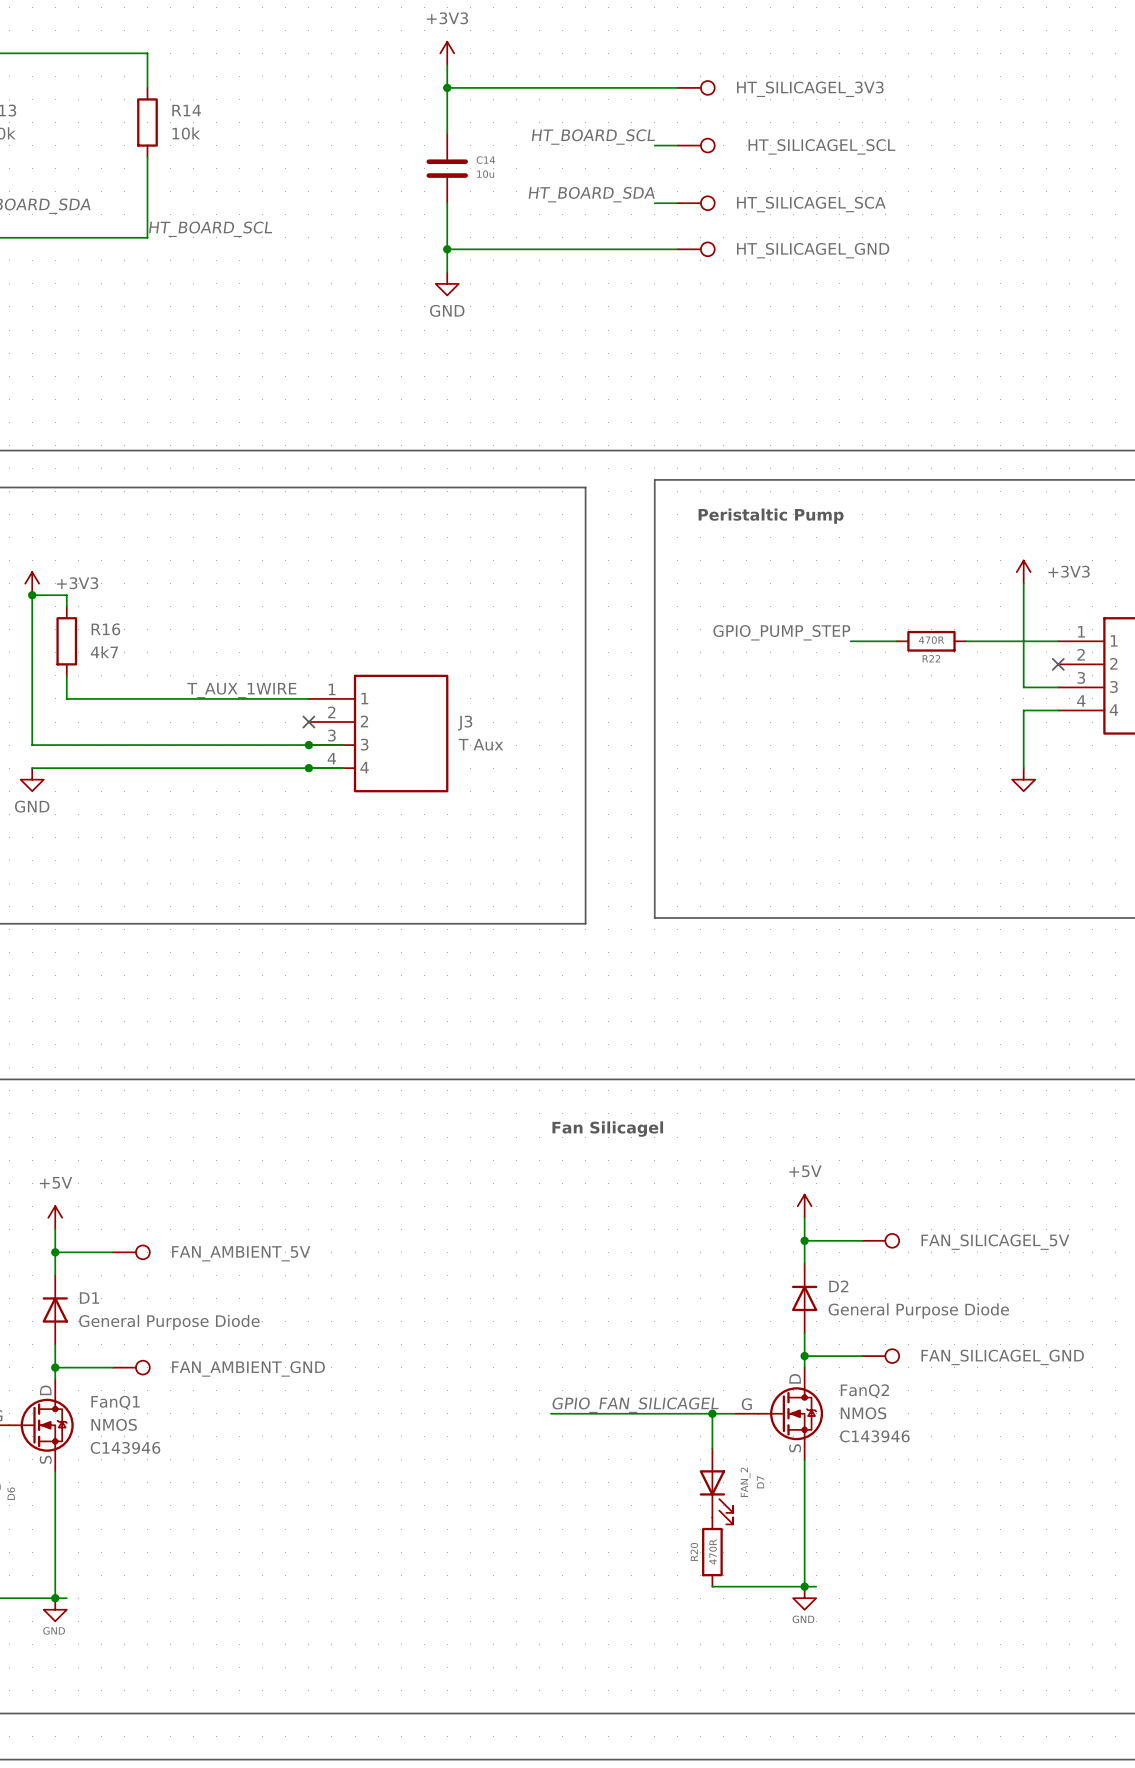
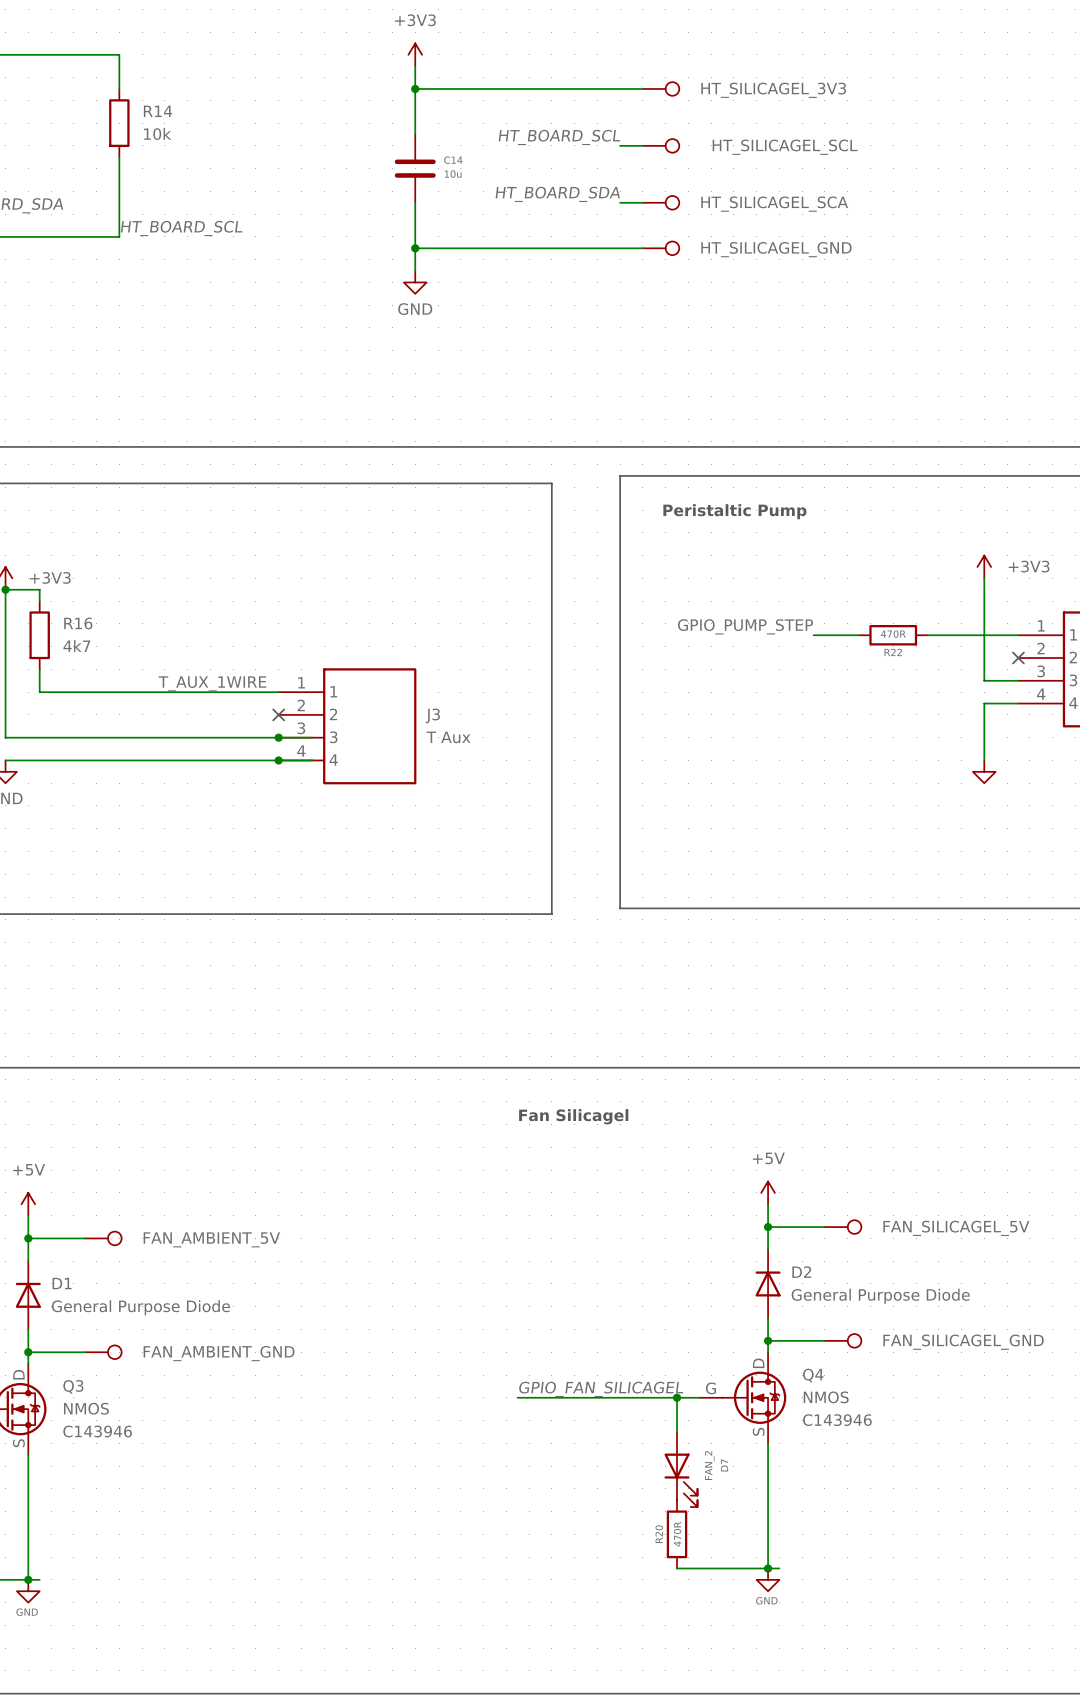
FanQ2 name: FanQ2 (864, 1391) -> Q4 (813, 1375)
FanQ1 name: FanQ1 (115, 1402) -> Q3 (73, 1386)

